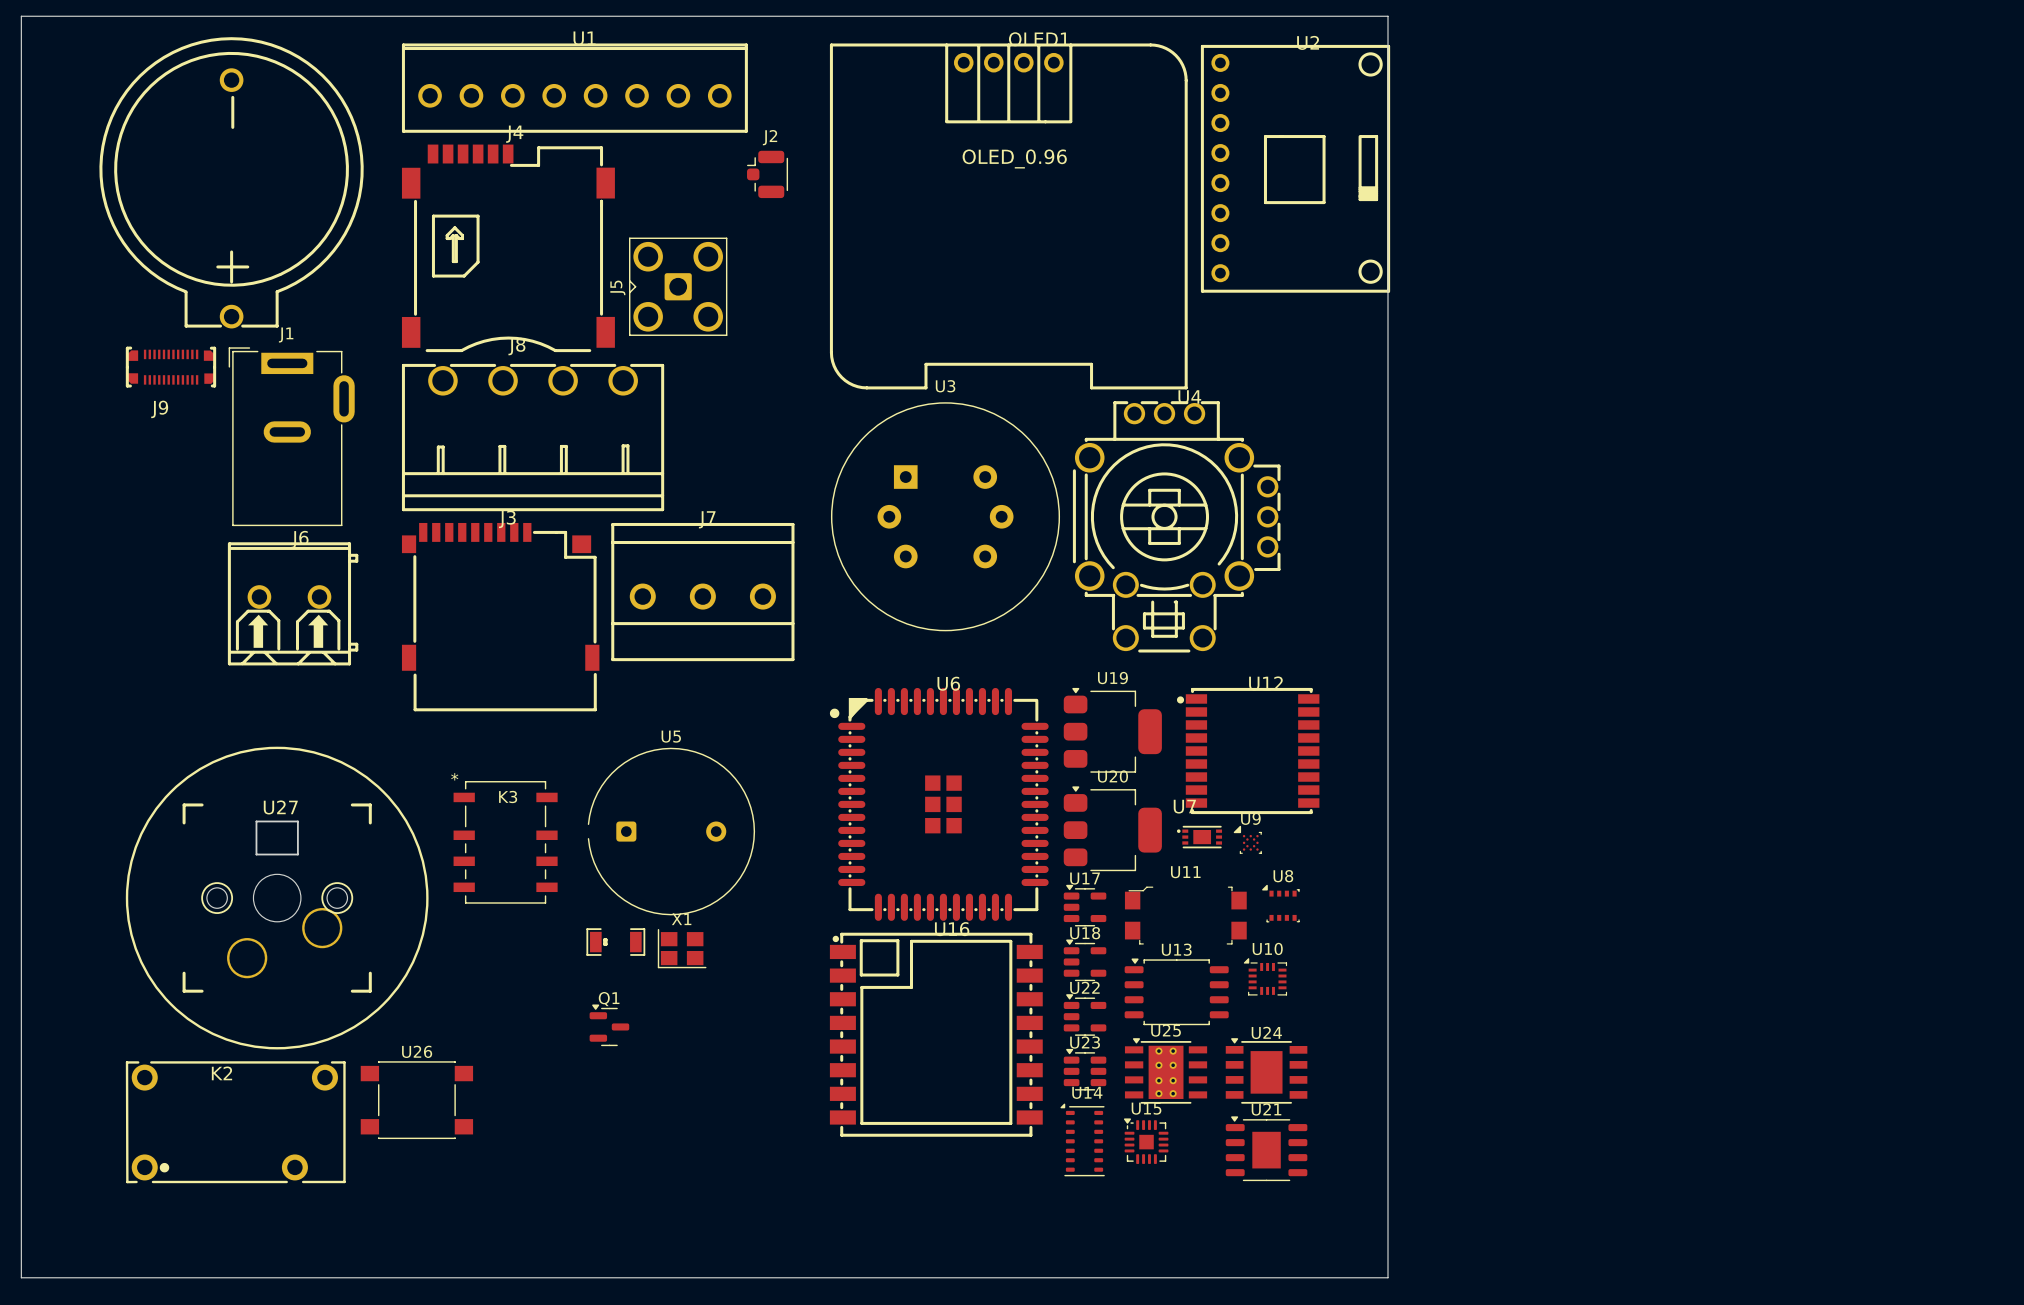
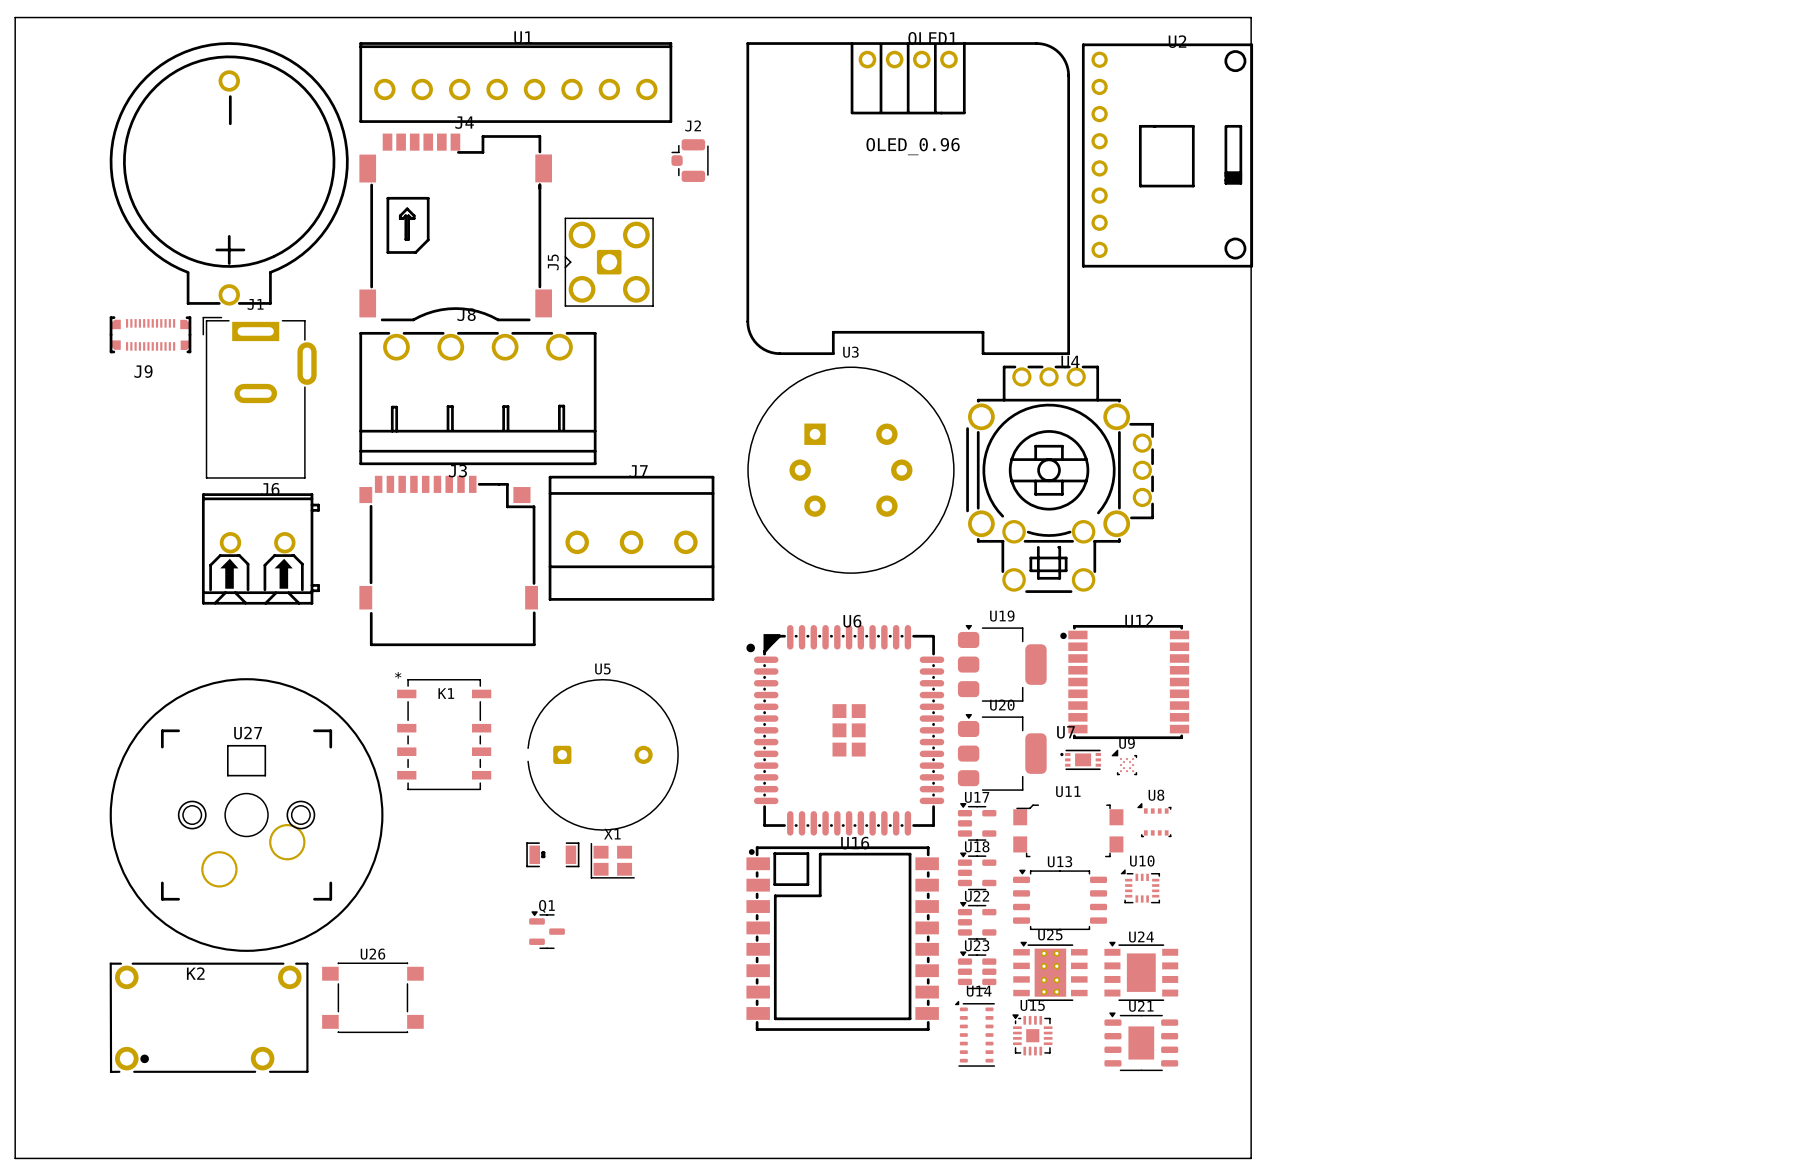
part: (231, 182) -> none
part: none -> (229, 173)
K1: none -> (444, 734)
K3: (505, 842) -> none

